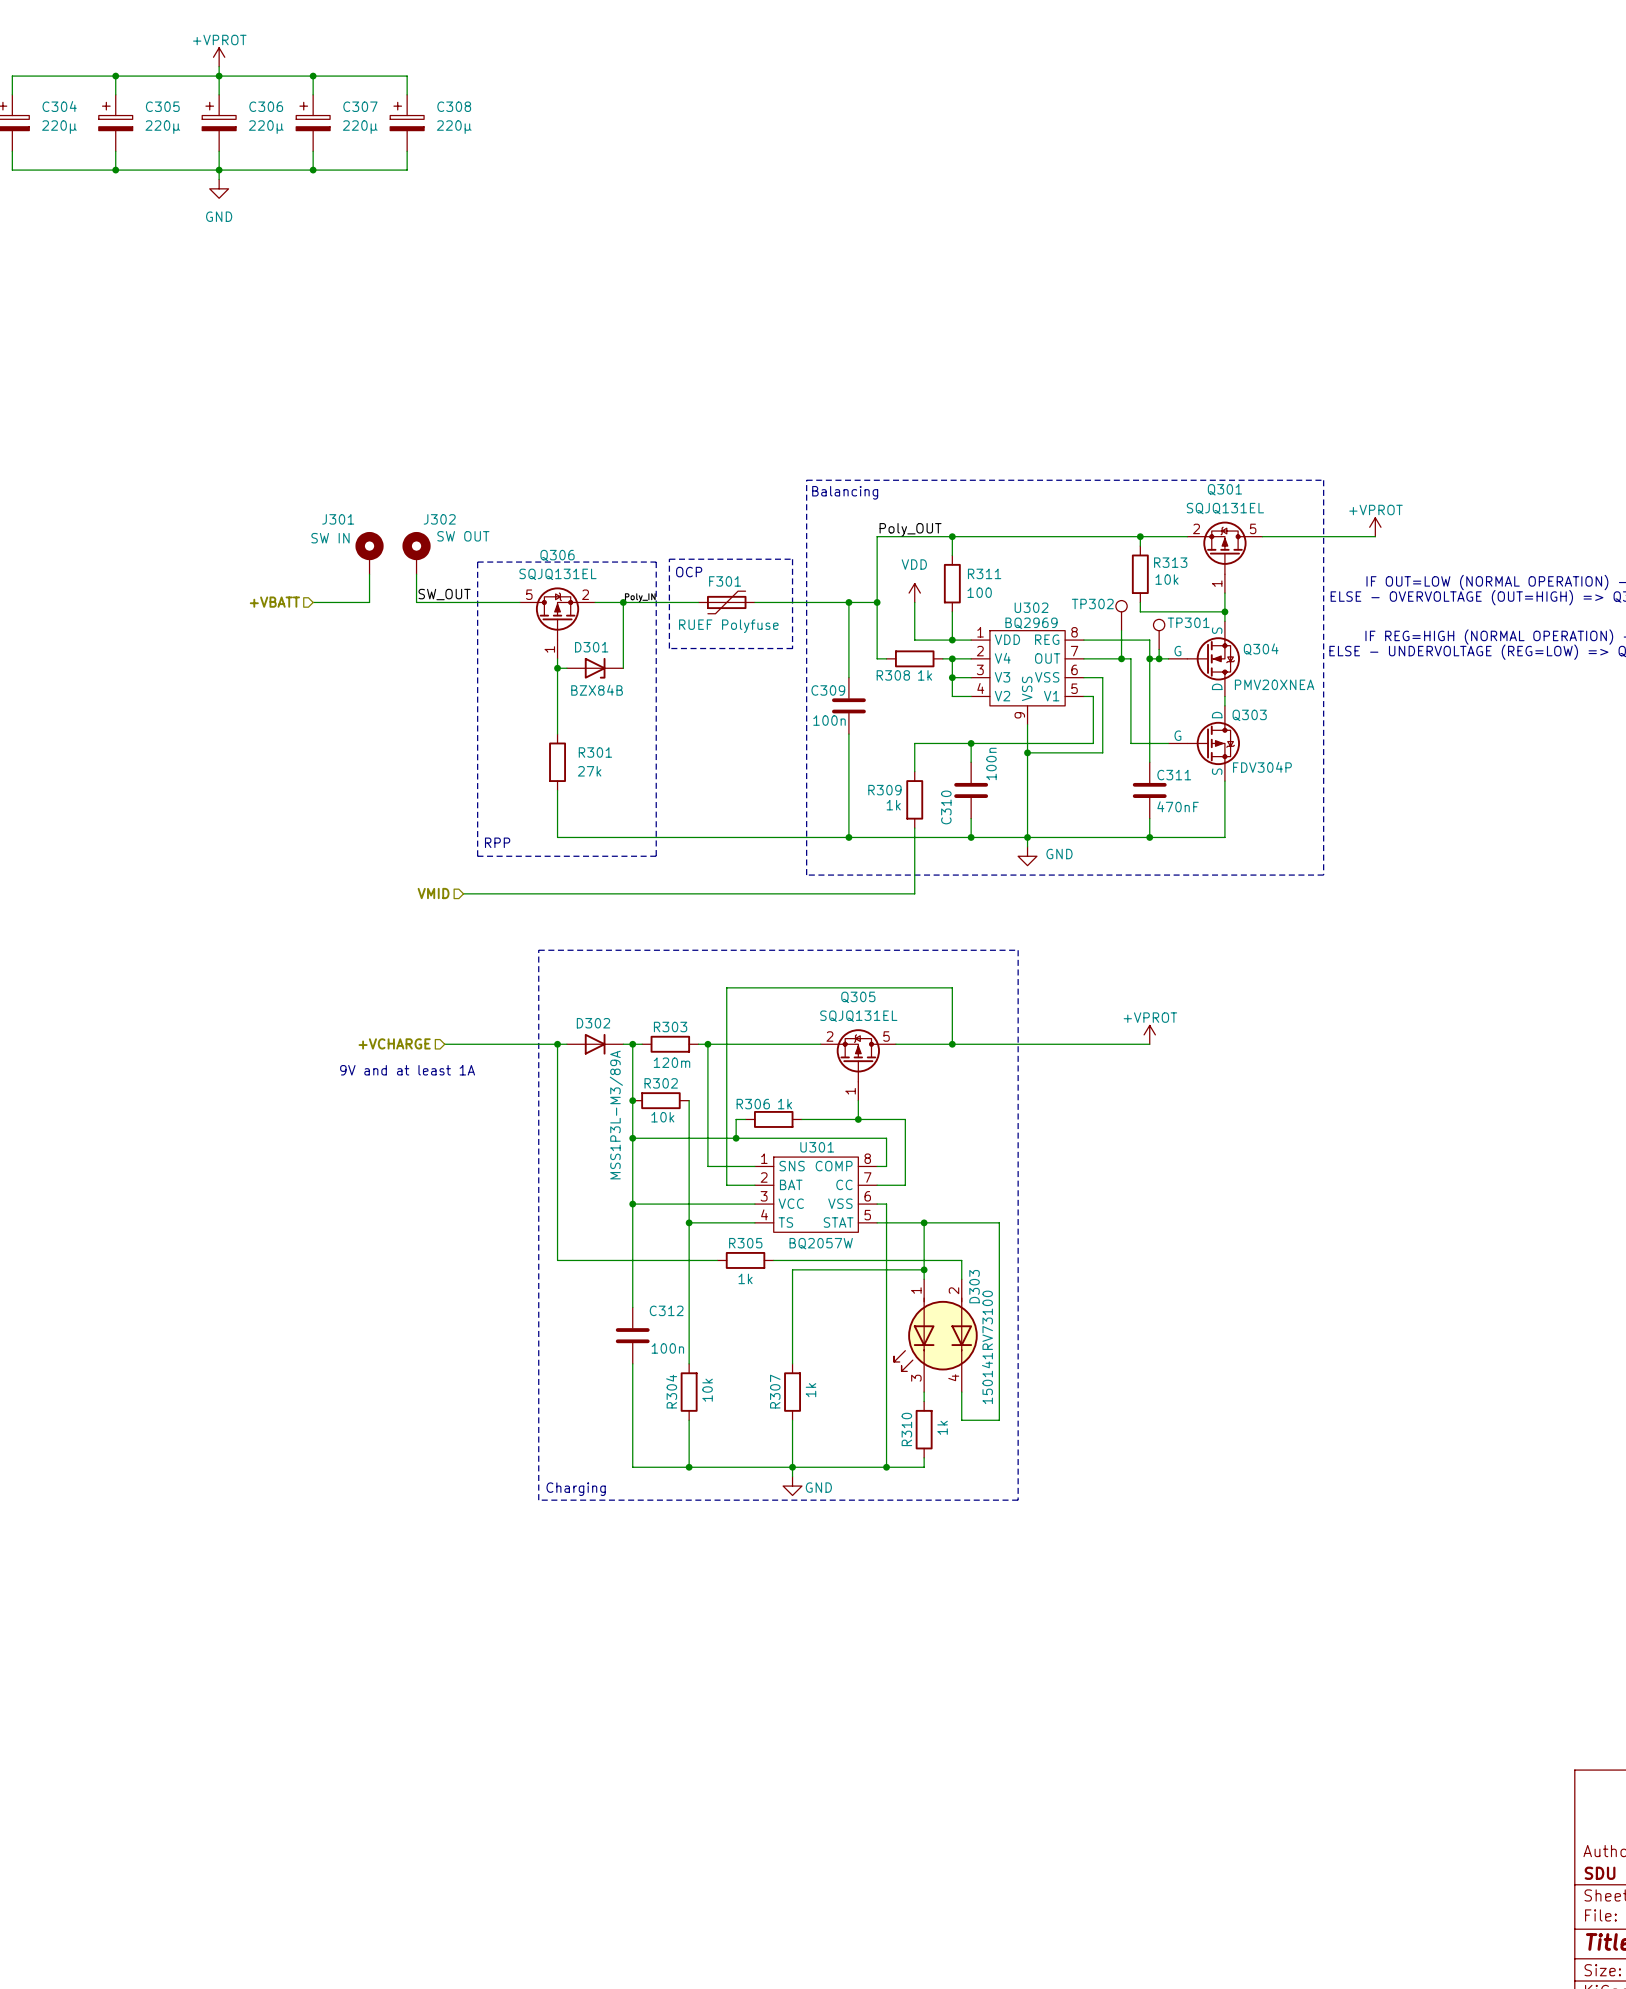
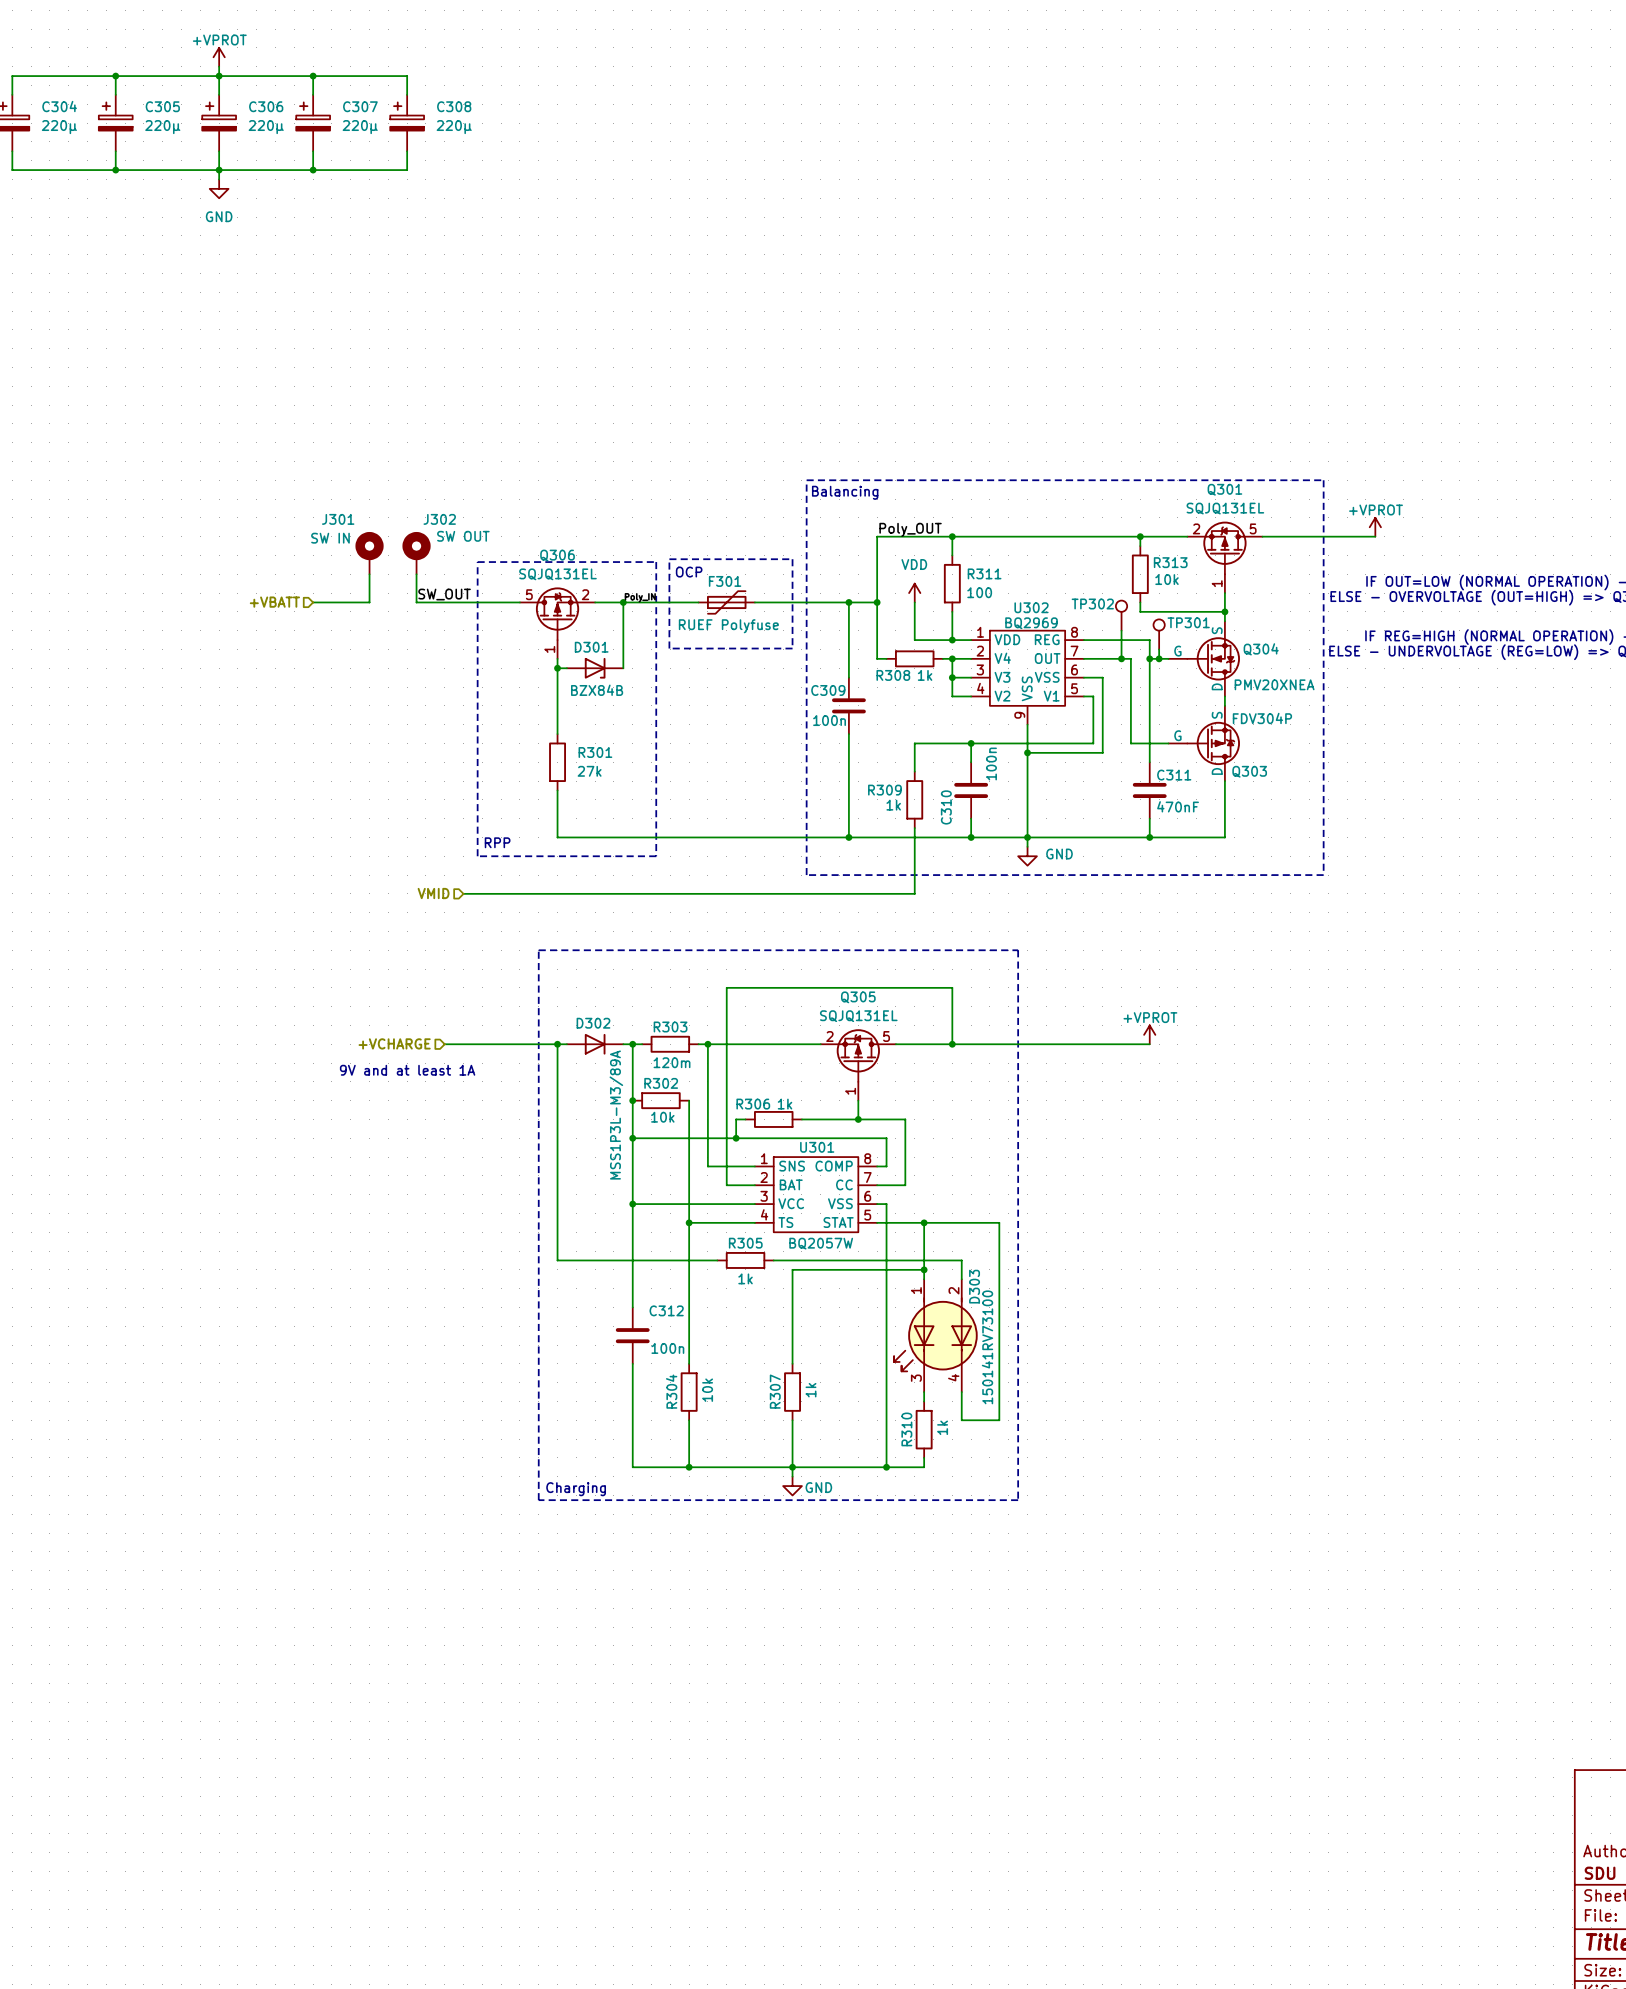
Q303 flip: as is (1213, 743) -> up-down (1213, 743)

